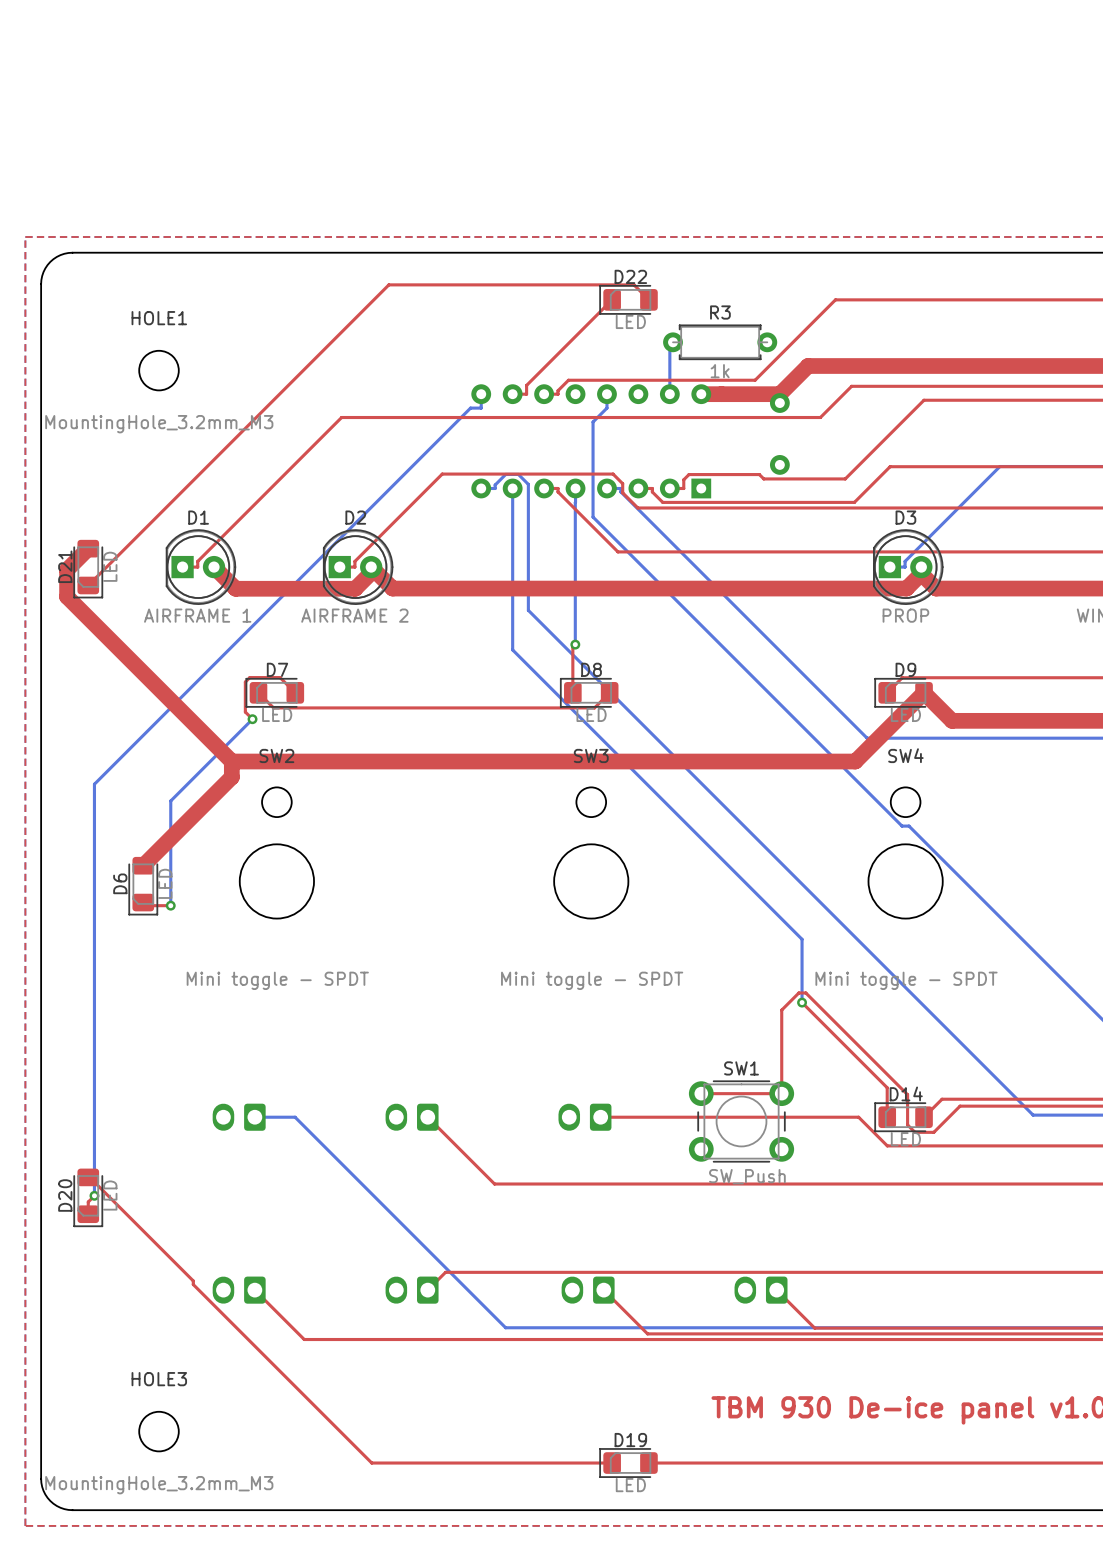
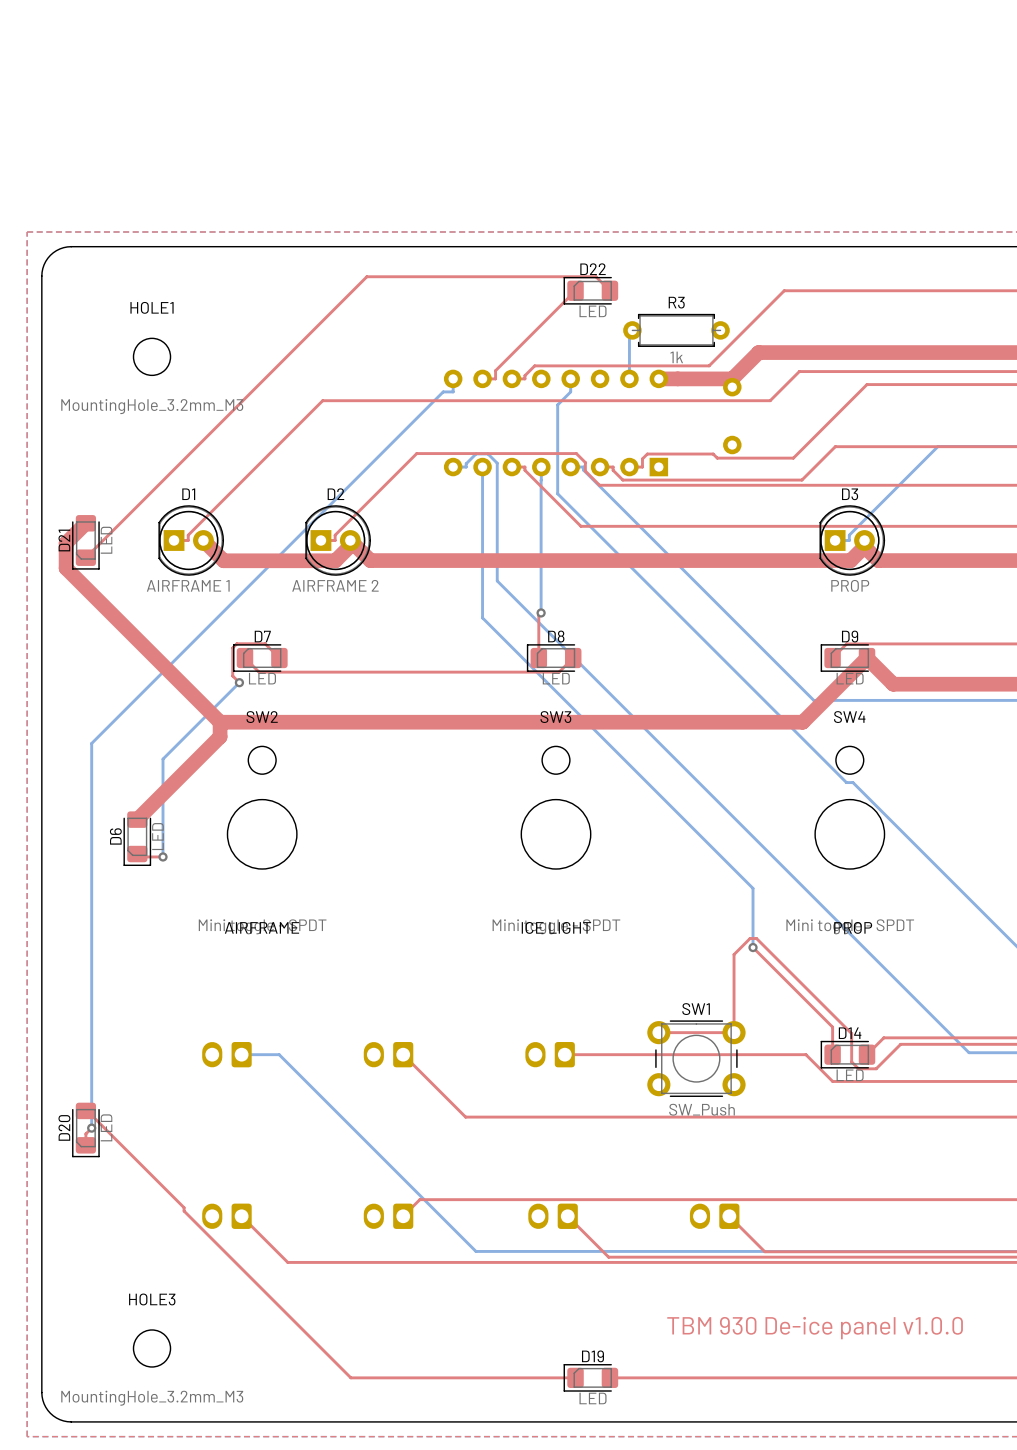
text: none -> AIRFRAME (261, 927)
text: none -> ICE LIGHT (556, 927)
text: none -> PROP (853, 927)

